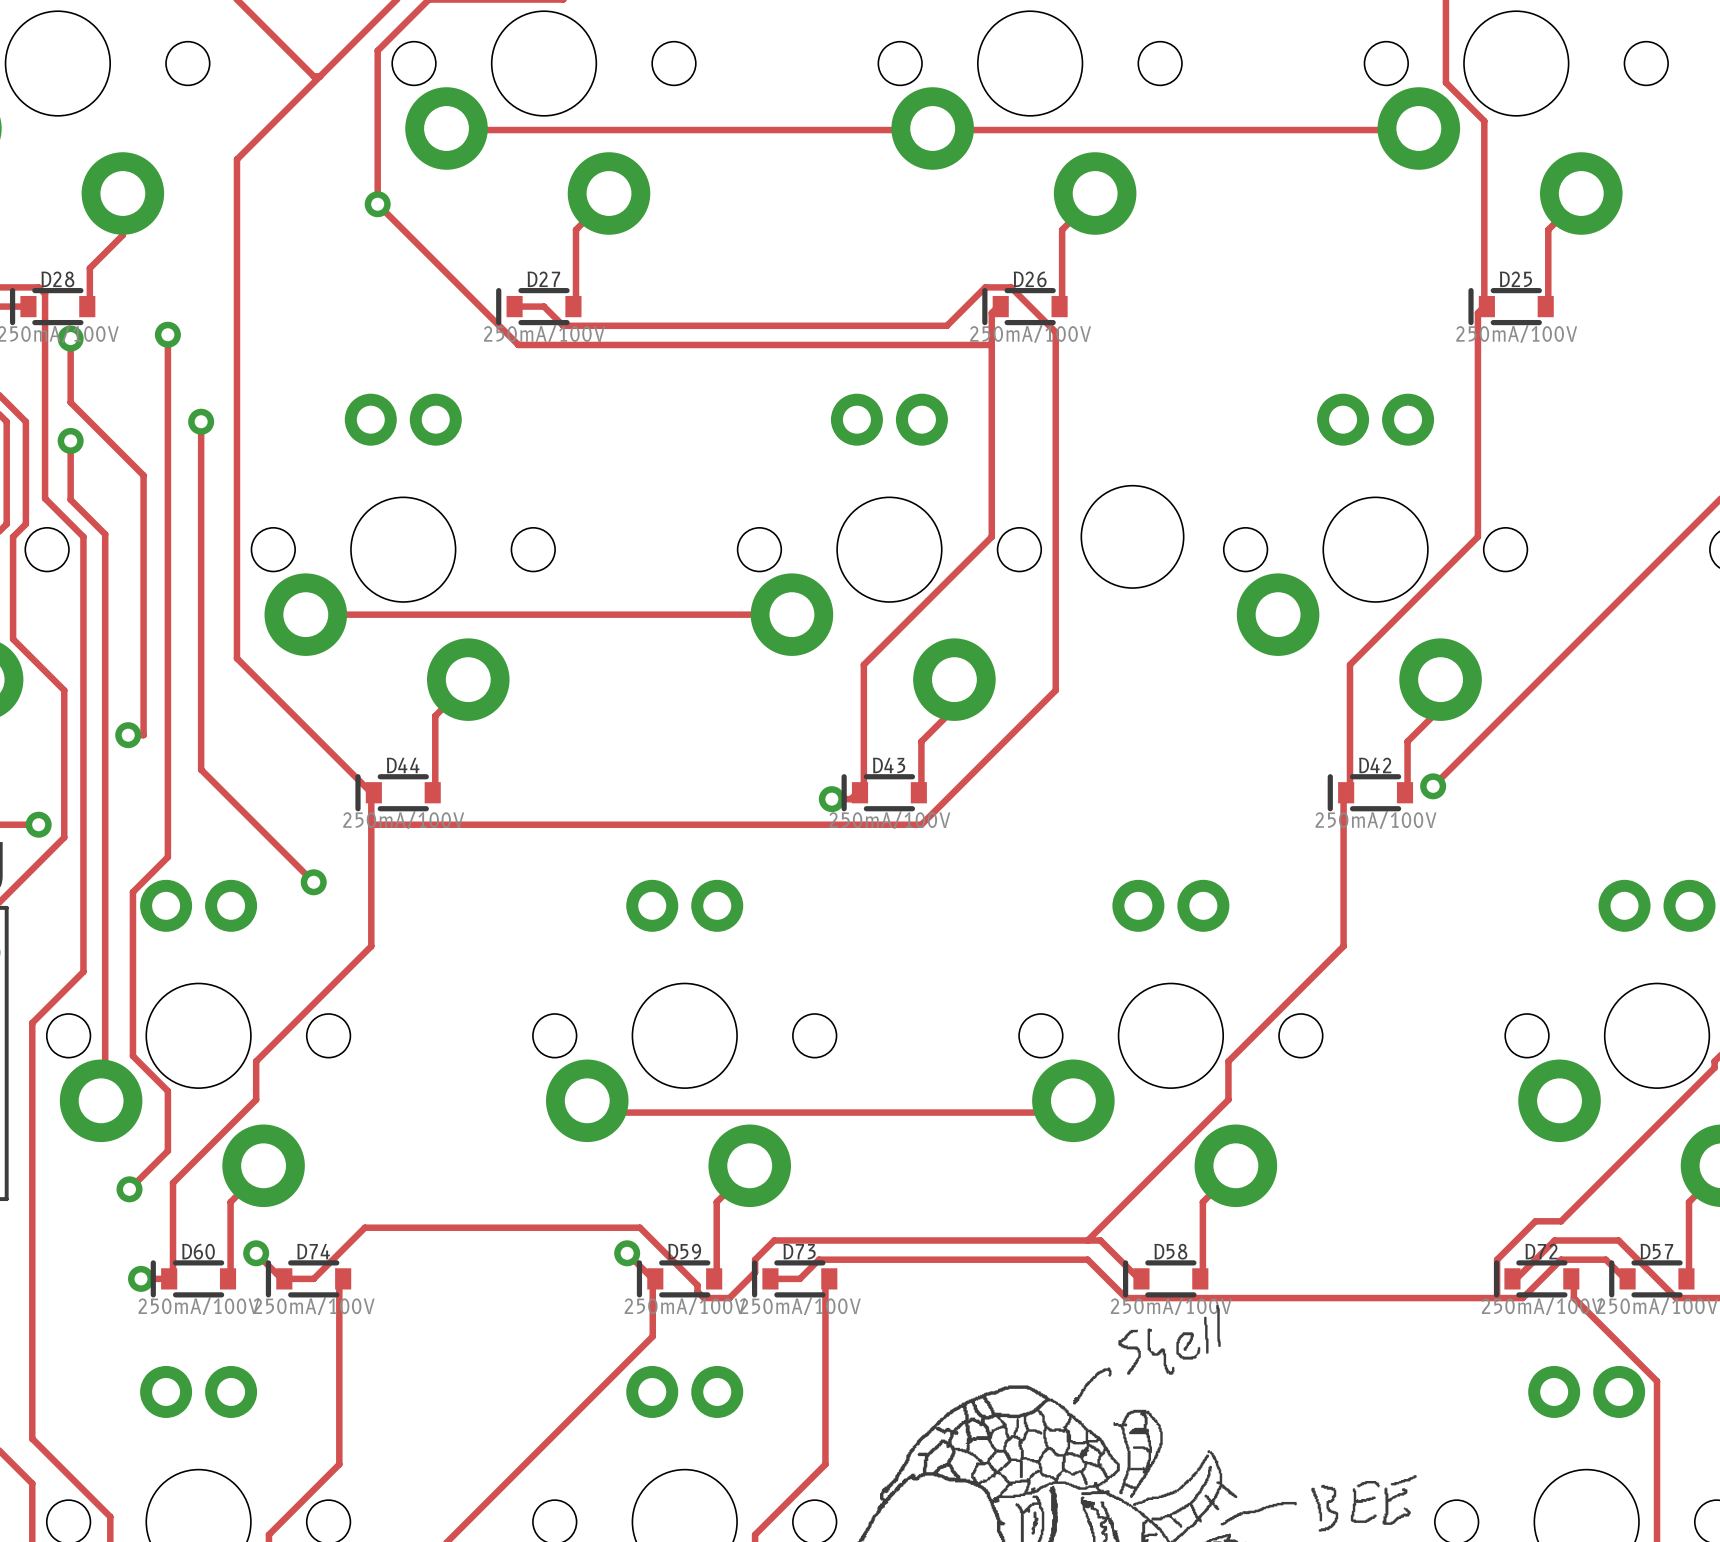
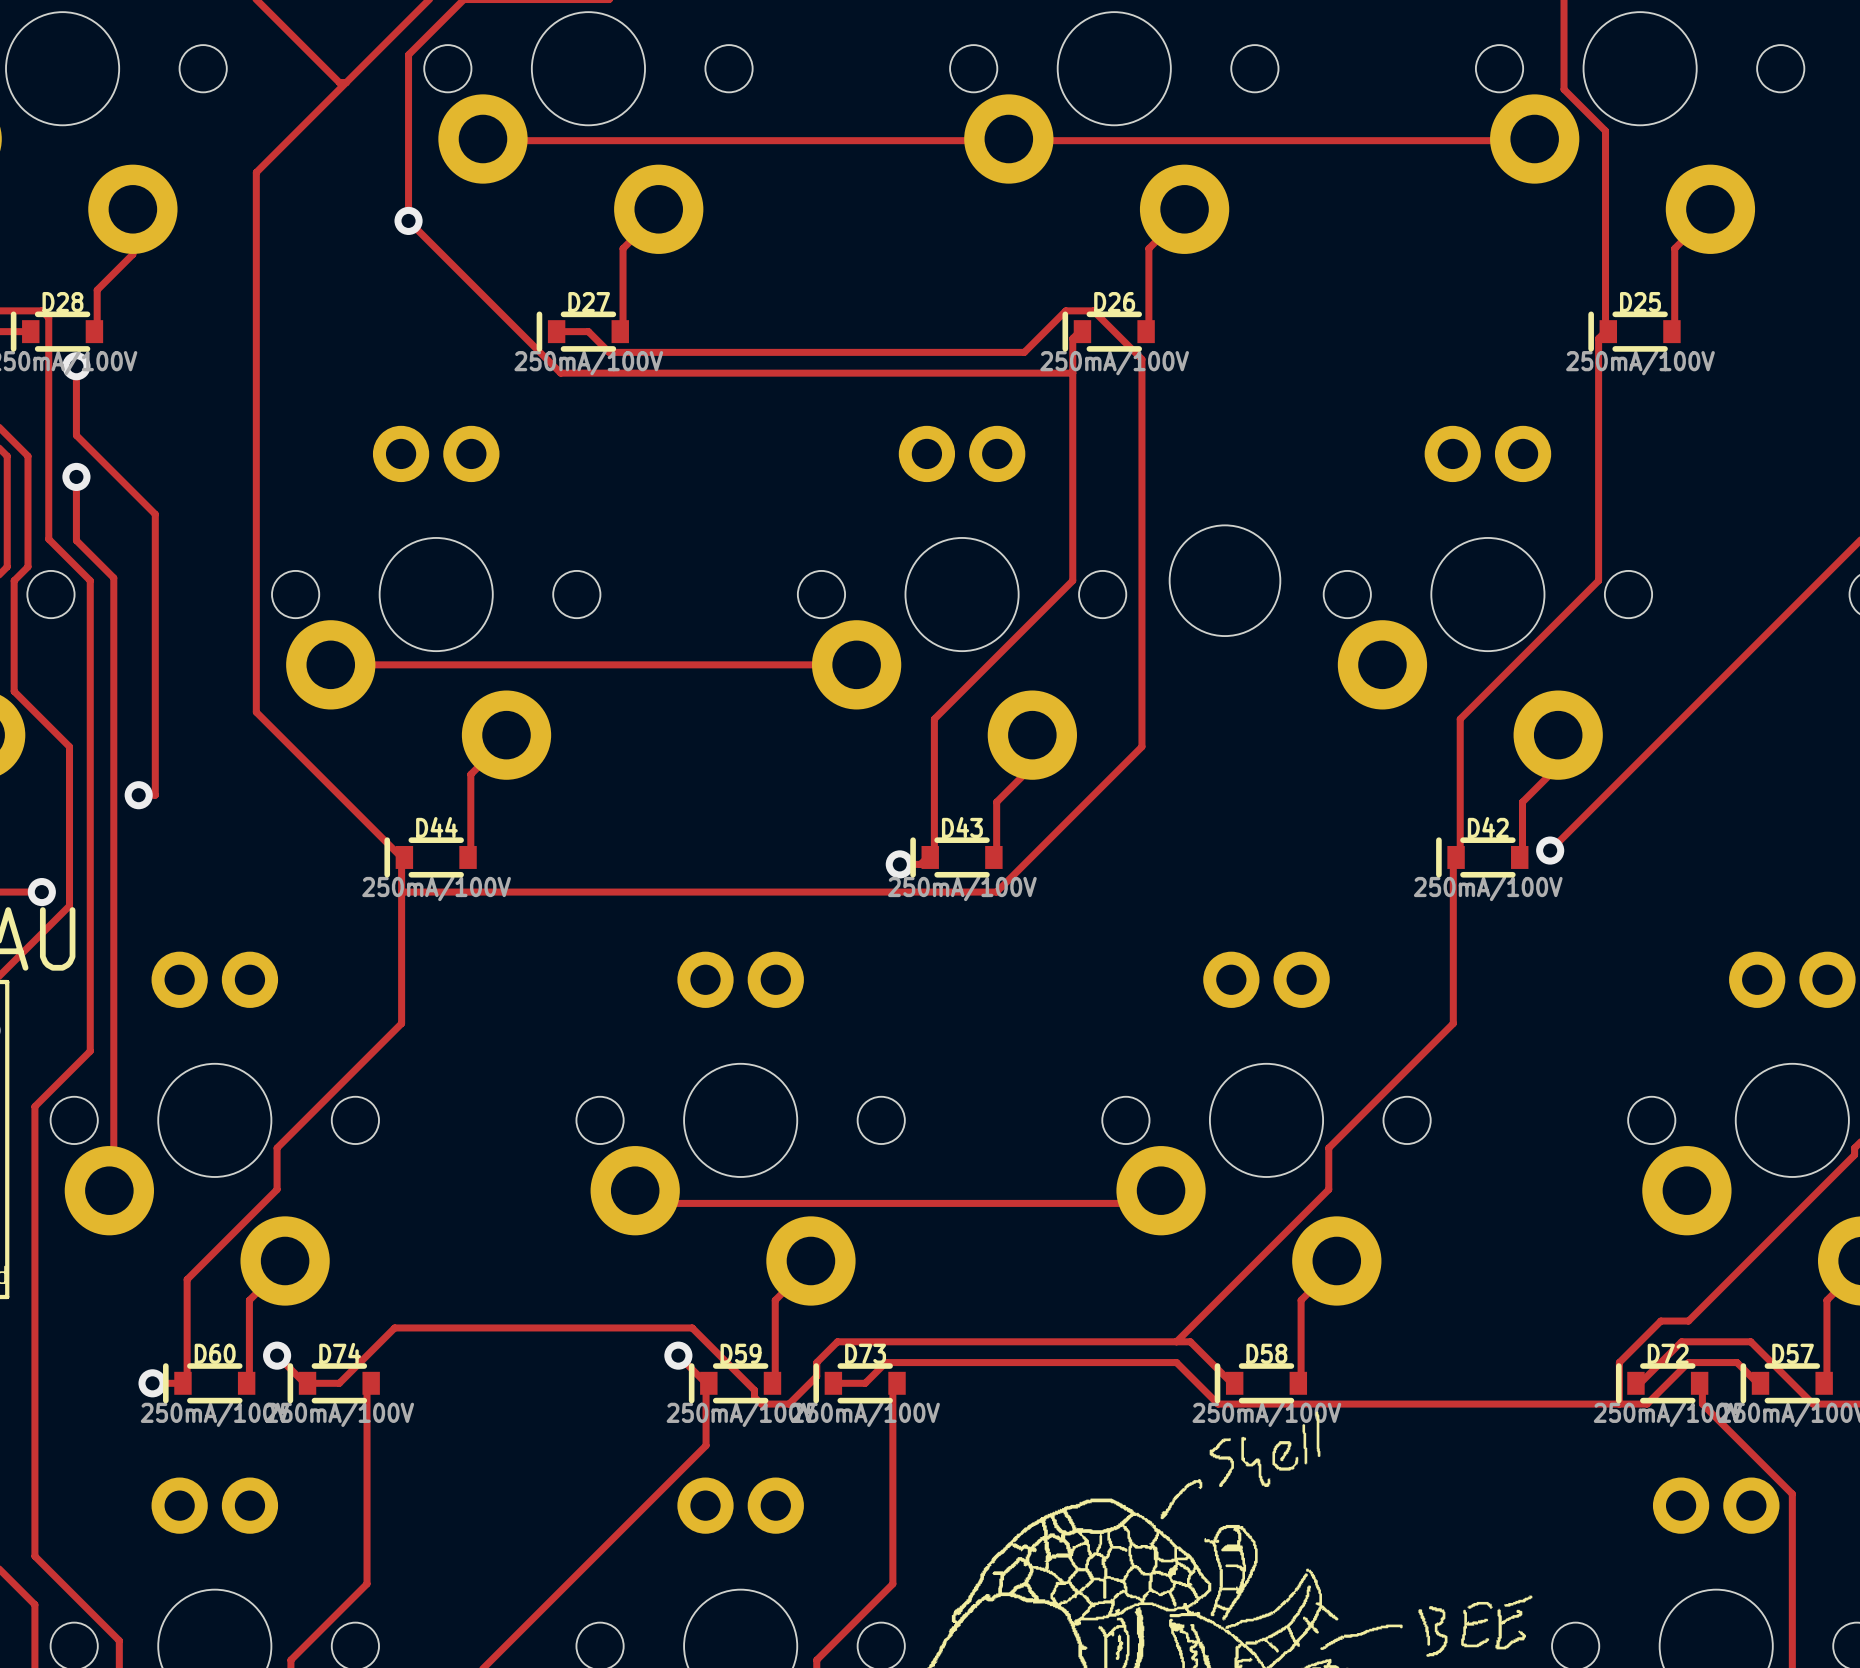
track: (167, 334) (167, 857) (132, 892) (132, 1056) (167, 1091) (167, 1150) (129, 1189) -> none
via: (167, 334) -> none
track: (201, 421) (201, 769) (313, 882) -> none
via: (201, 421) -> none
via: (313, 882) -> none
via: (129, 1189) -> none

